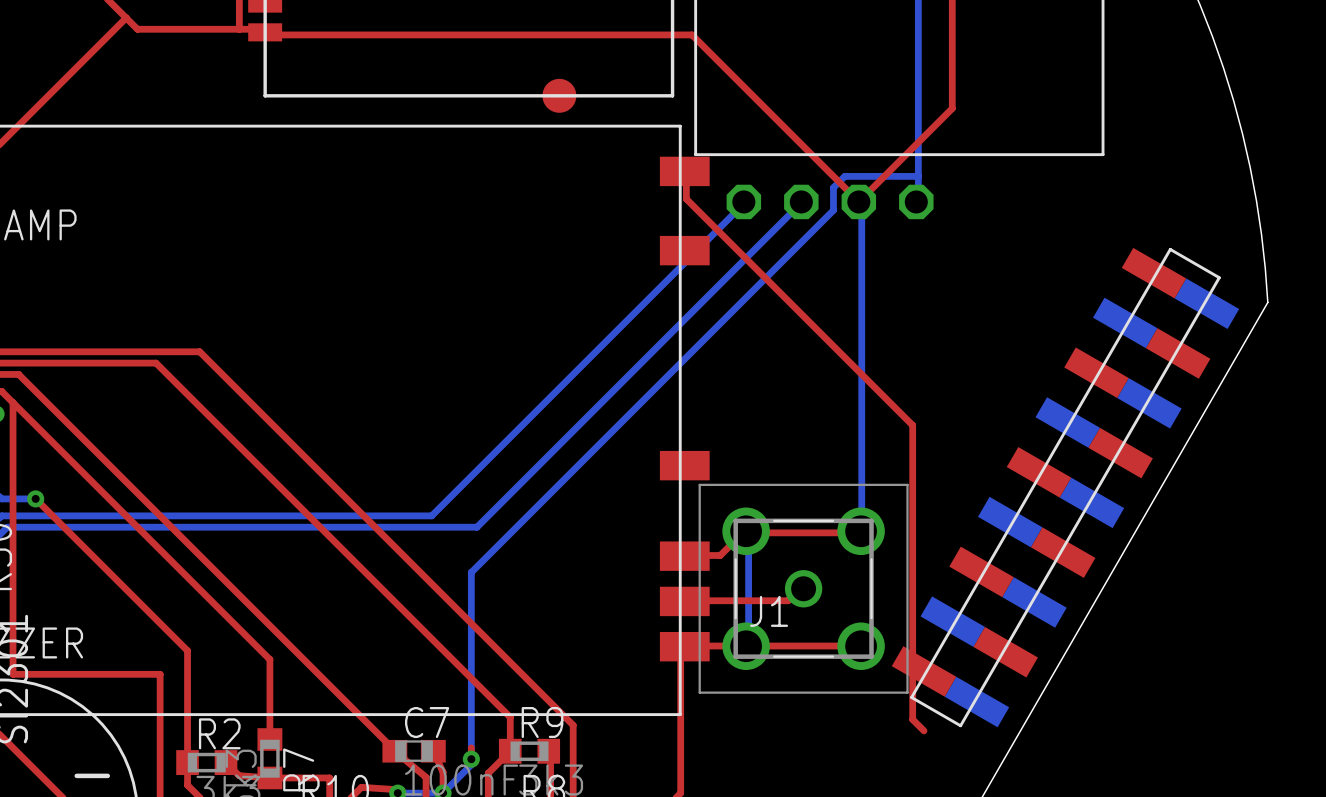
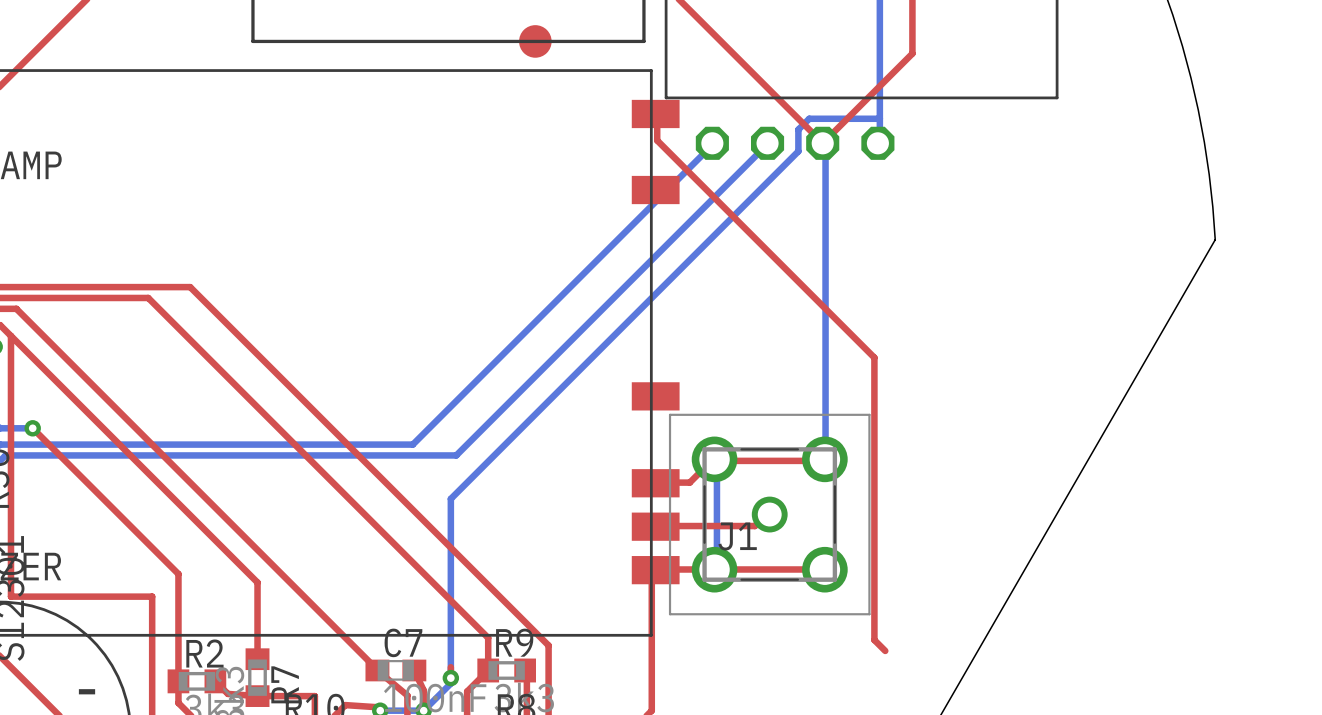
part: (1056, 487) -> none
part: (1079, 502) -> none

